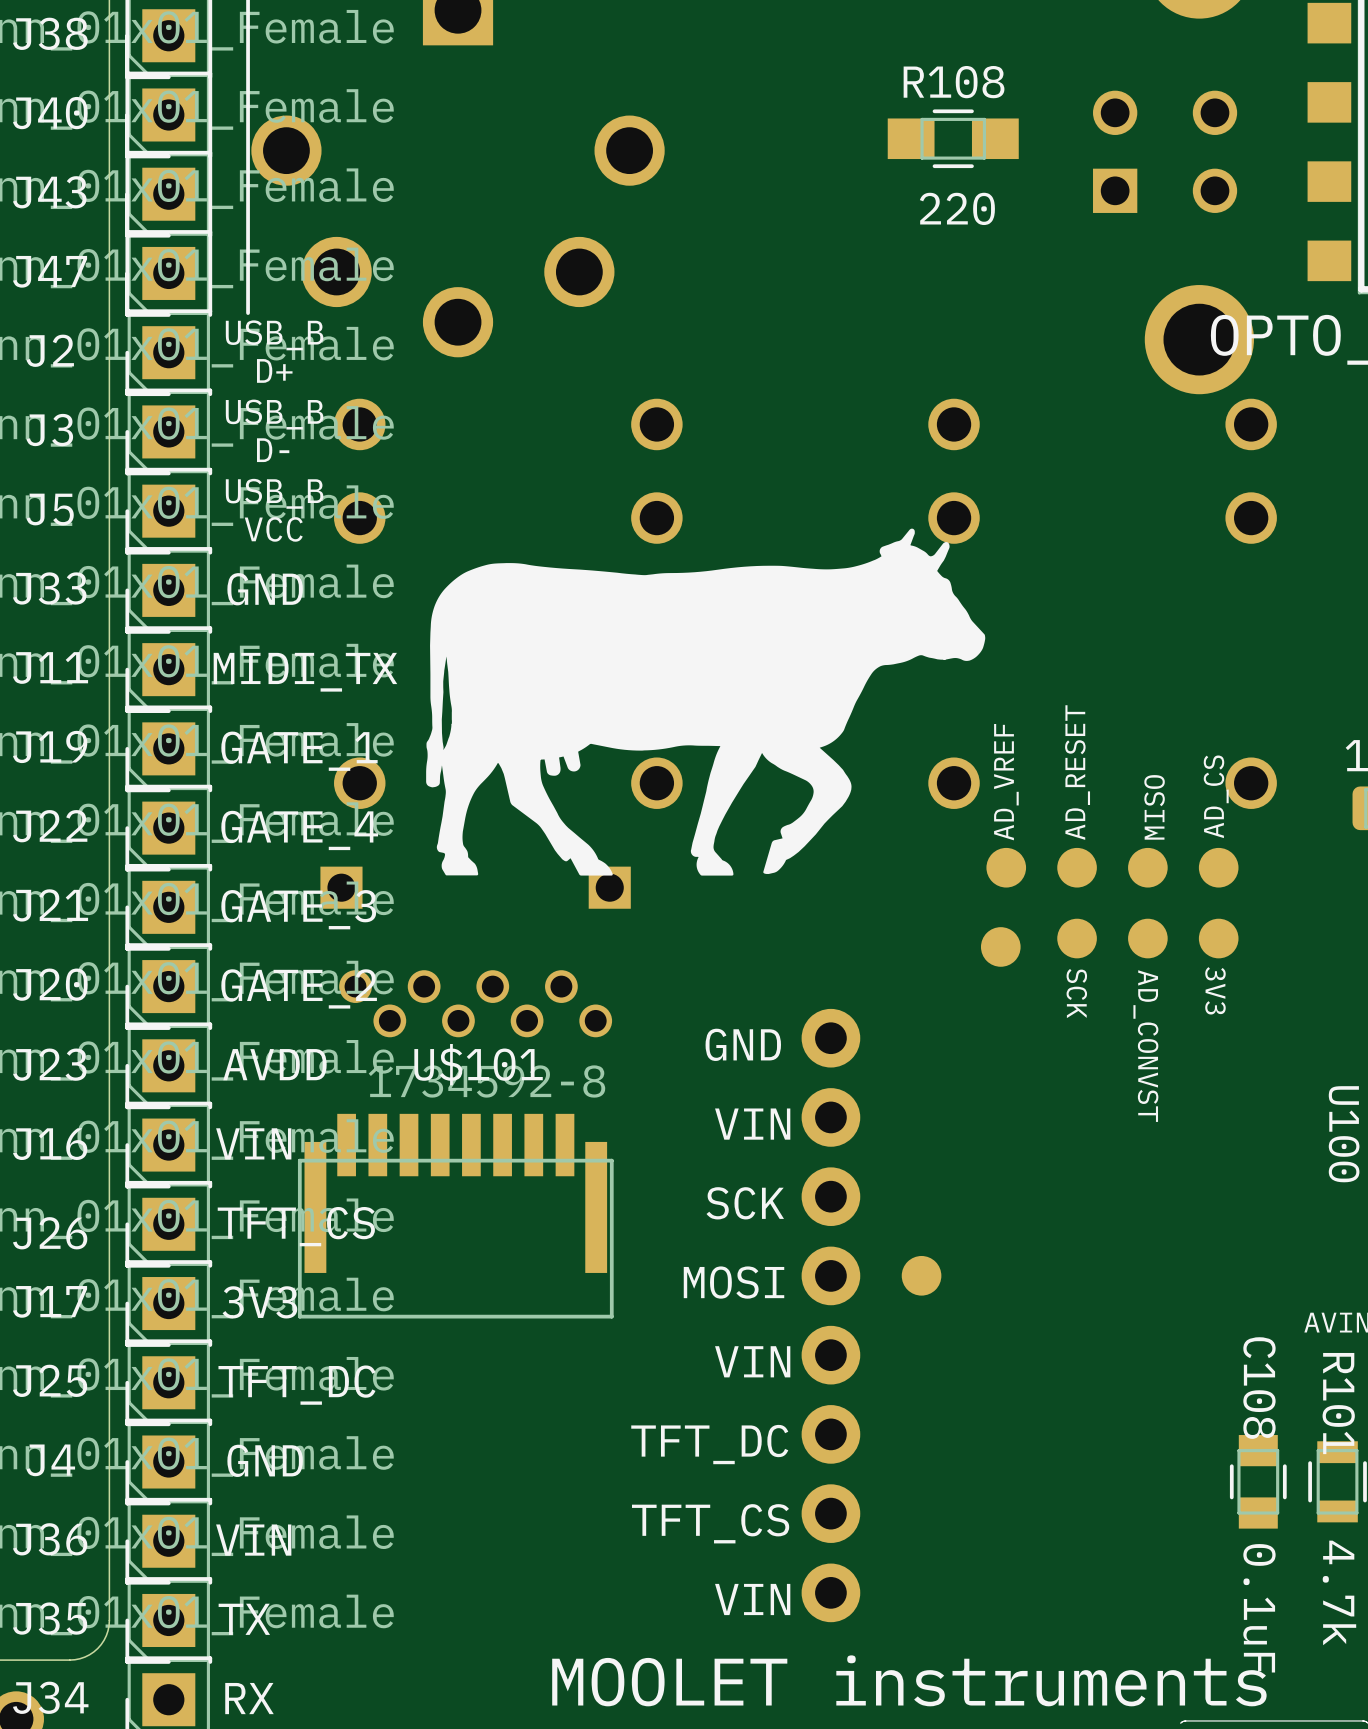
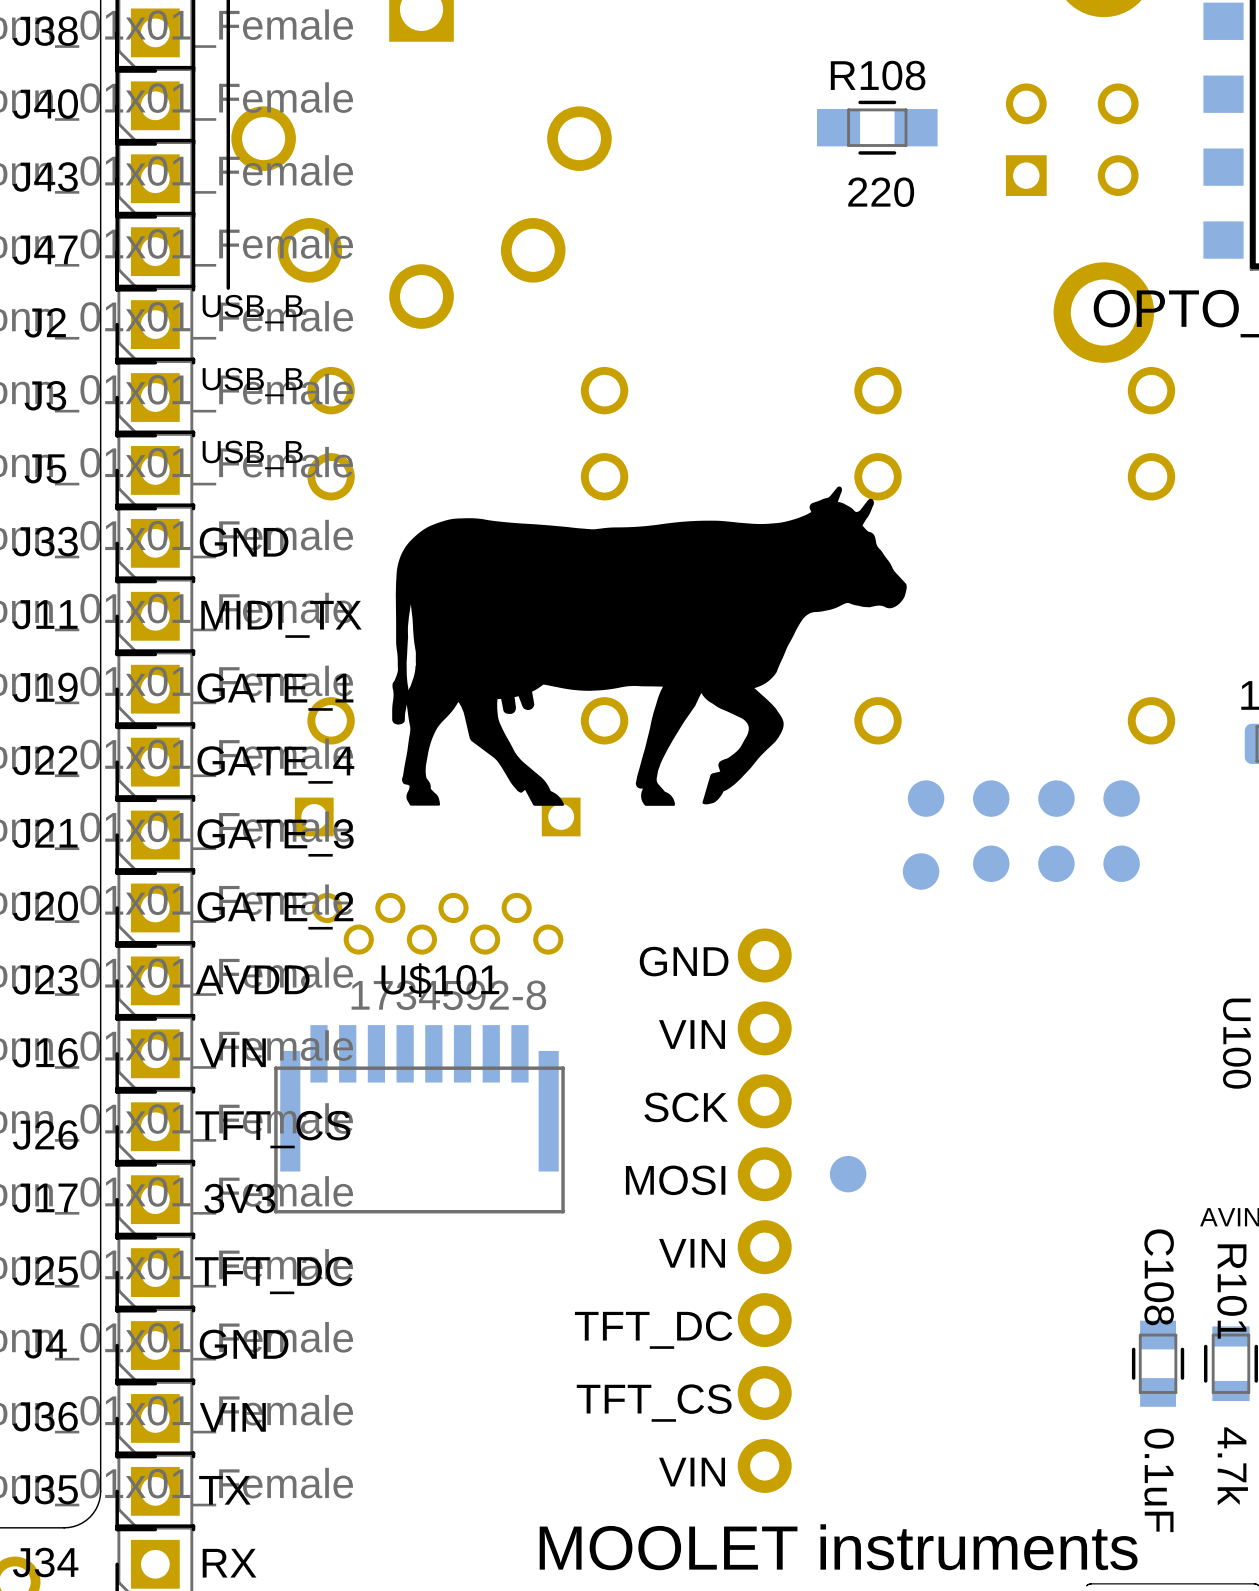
text: D+ (274, 370) -> none
text: D- (273, 450) -> none
text: VCC (273, 529) -> none
text: AD_RESET (1077, 772) -> none
text: AD_VREF (1006, 782) -> none
text: AD_CS (1216, 796) -> none
text: MISO (1154, 807) -> none
text: 3V3 (1215, 990) -> none
text: SCK (1076, 993) -> none
text: AD_CONVST (1145, 1046) -> none

